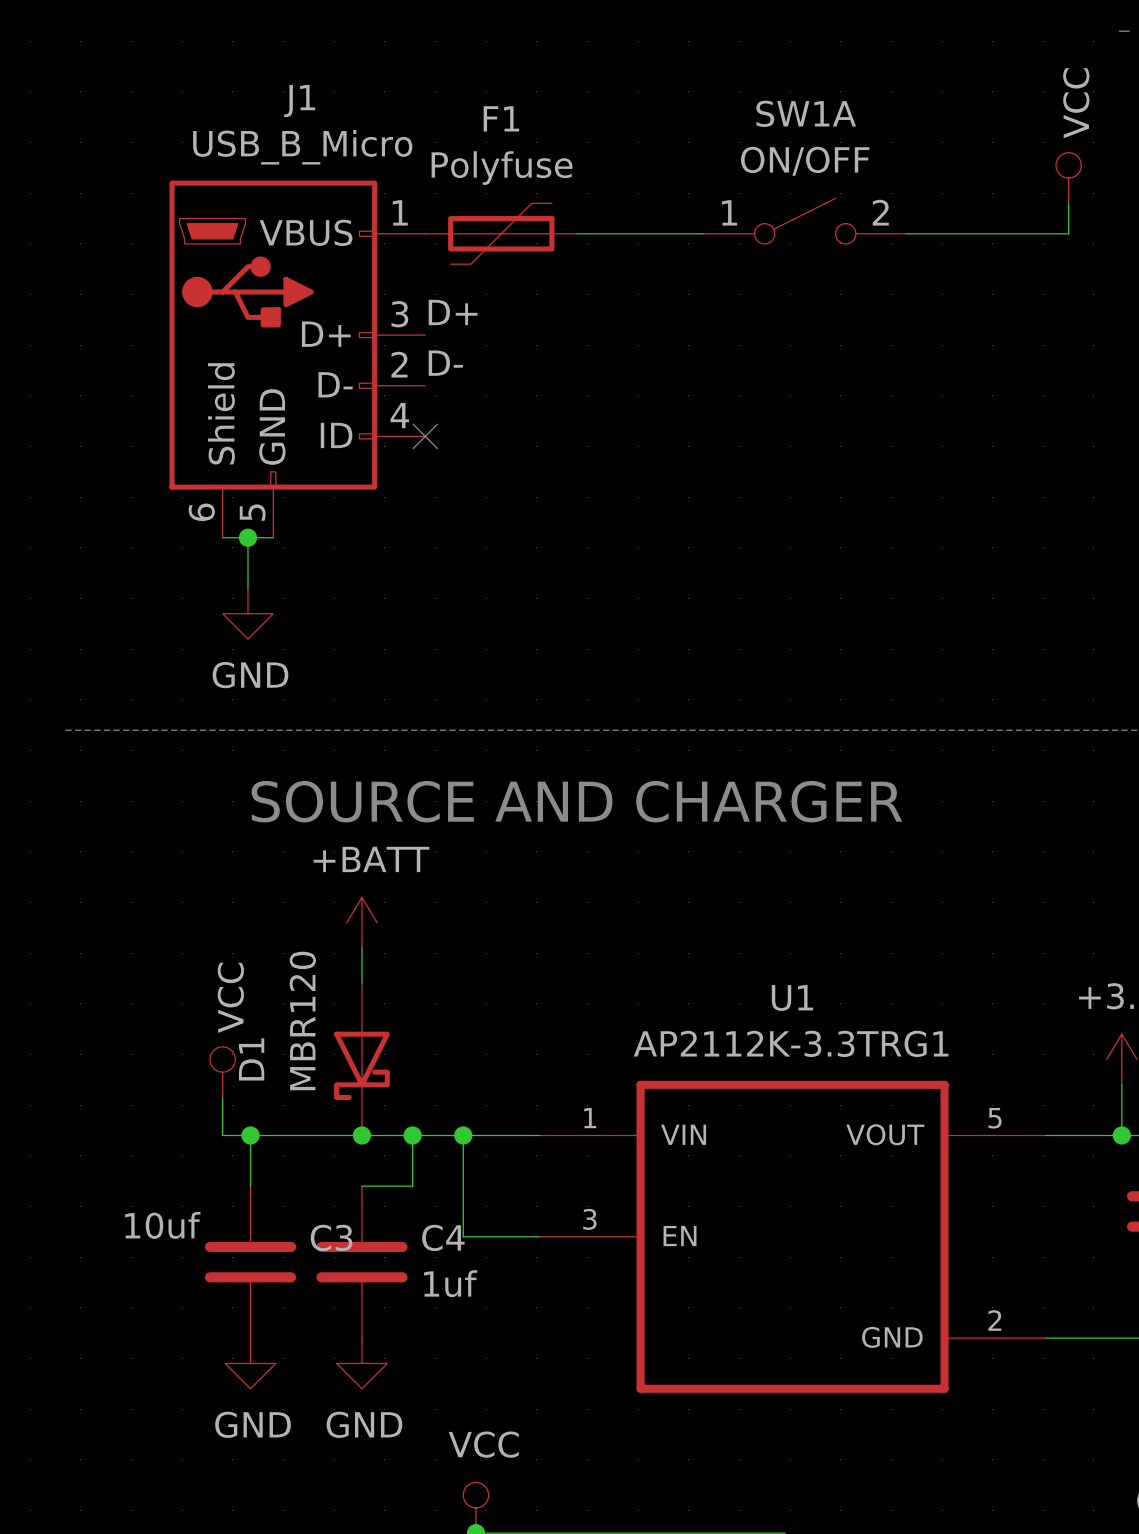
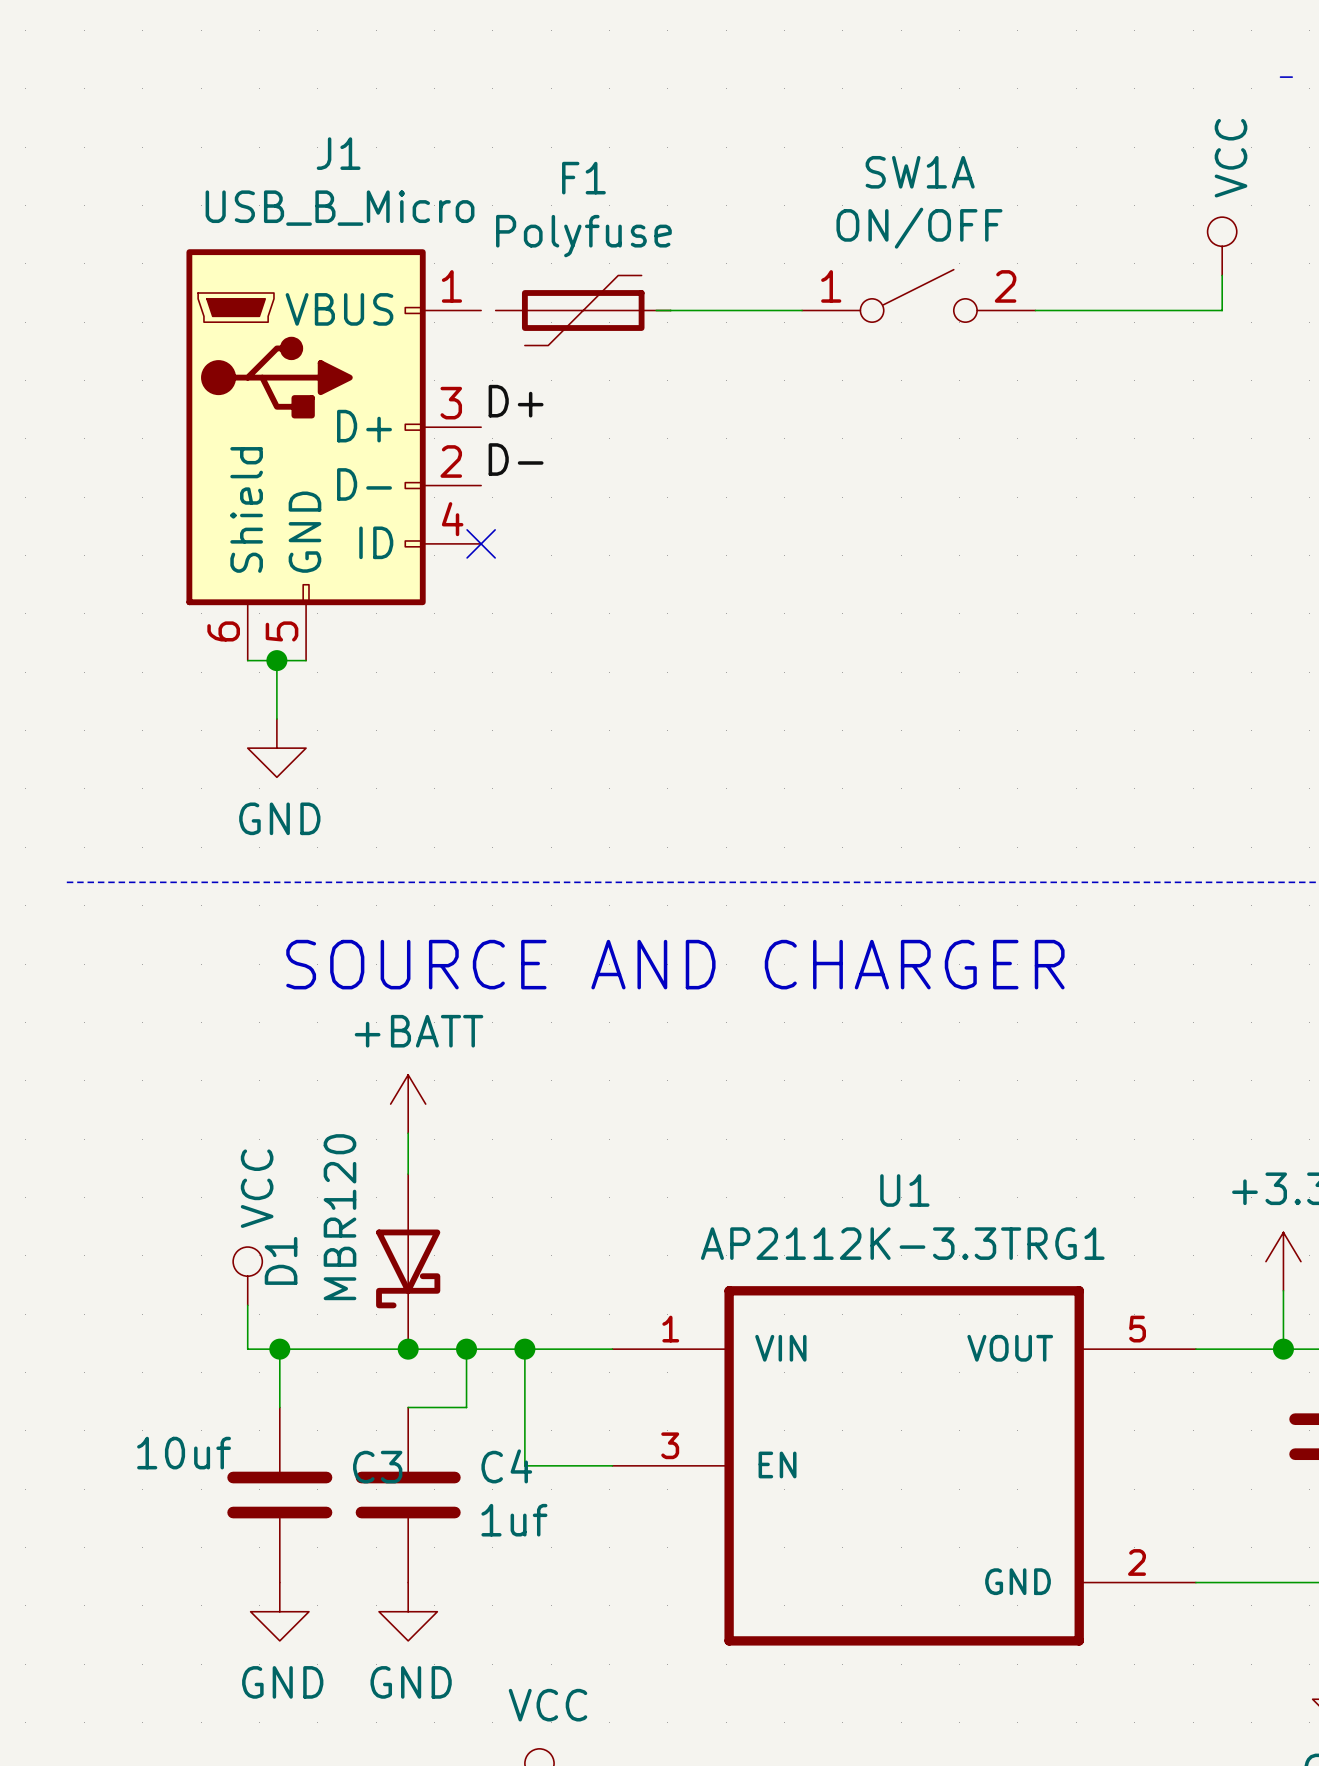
F1 position: (501, 233) -> (583, 310)

